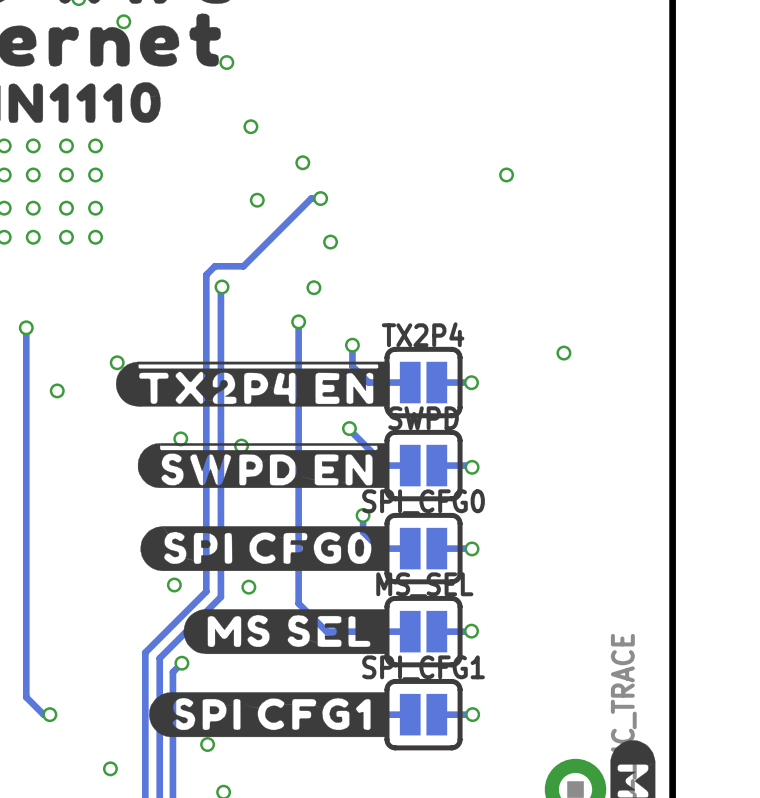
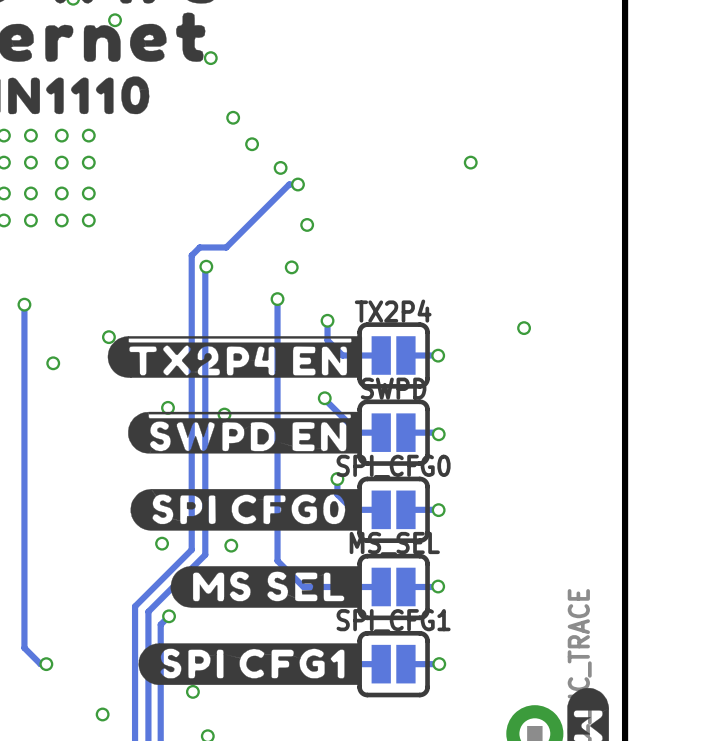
via: none -> (252, 144)
via: (302, 162) -> none
via: none -> (280, 167)
via: (257, 200) -> none

